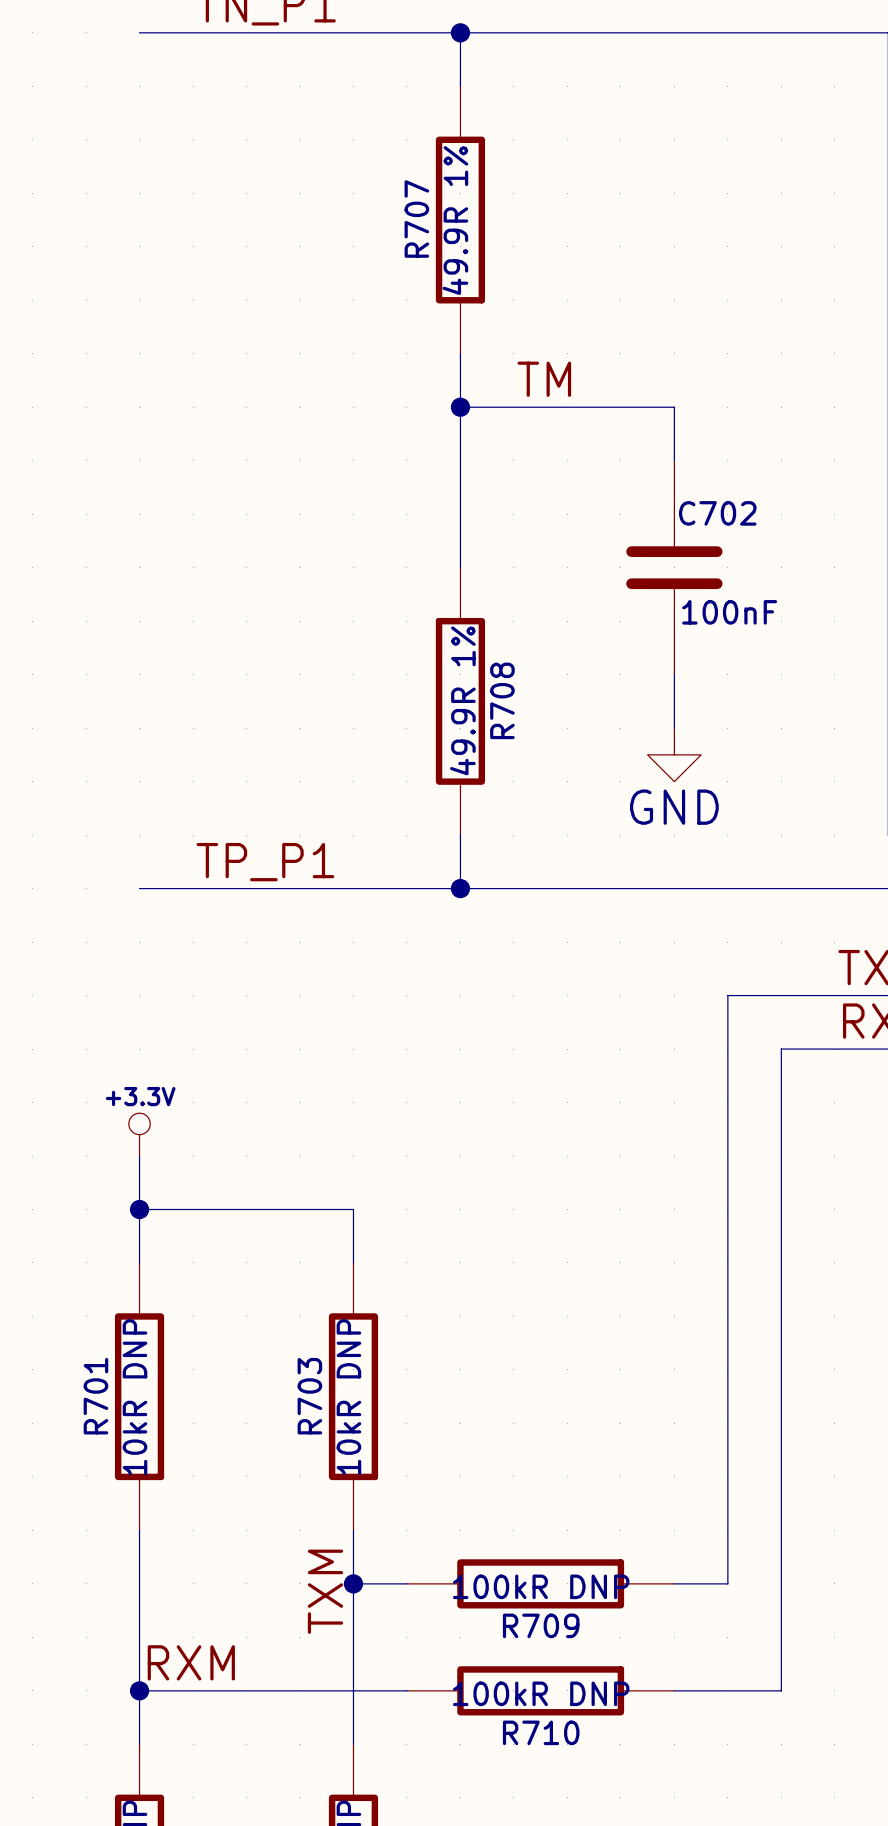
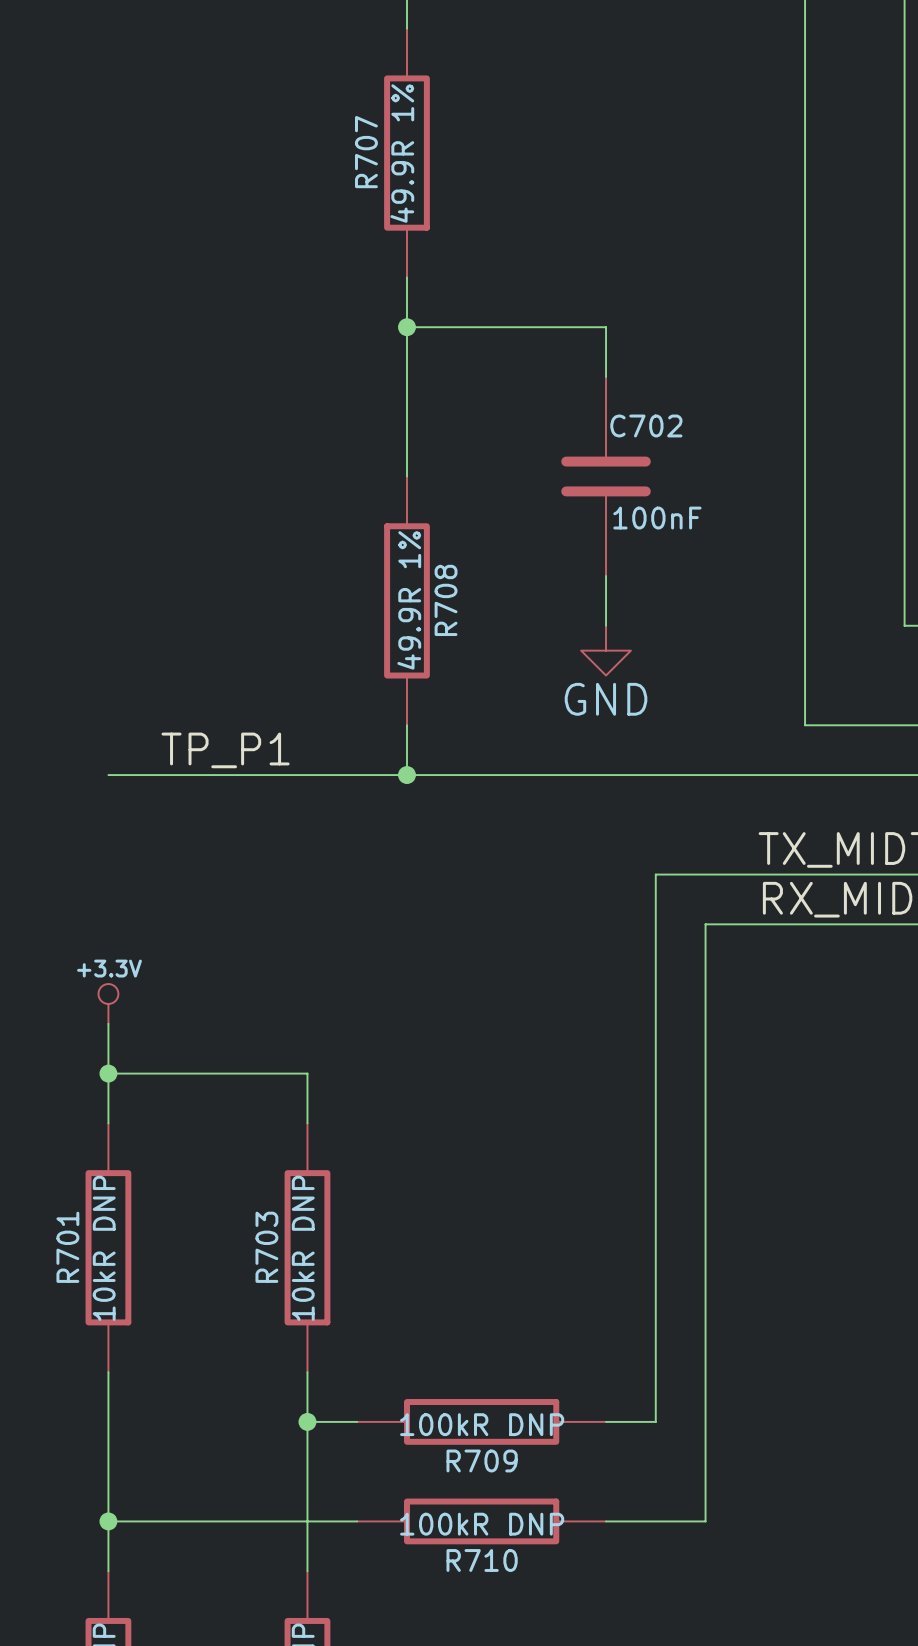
label: TM (544, 379) -> none
label: TXM (325, 1591) -> none
label: RXM (191, 1662) -> none

